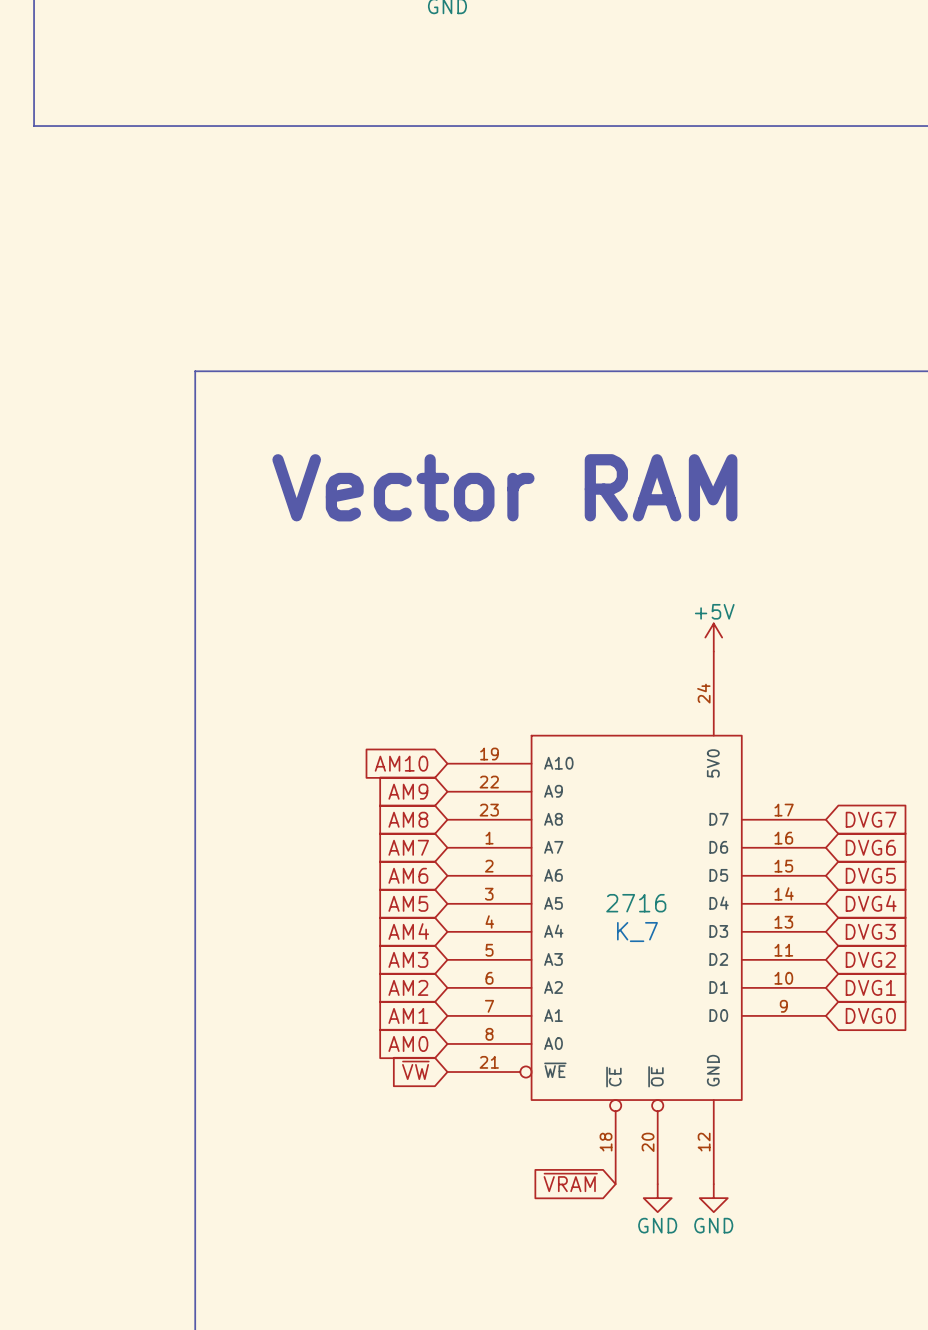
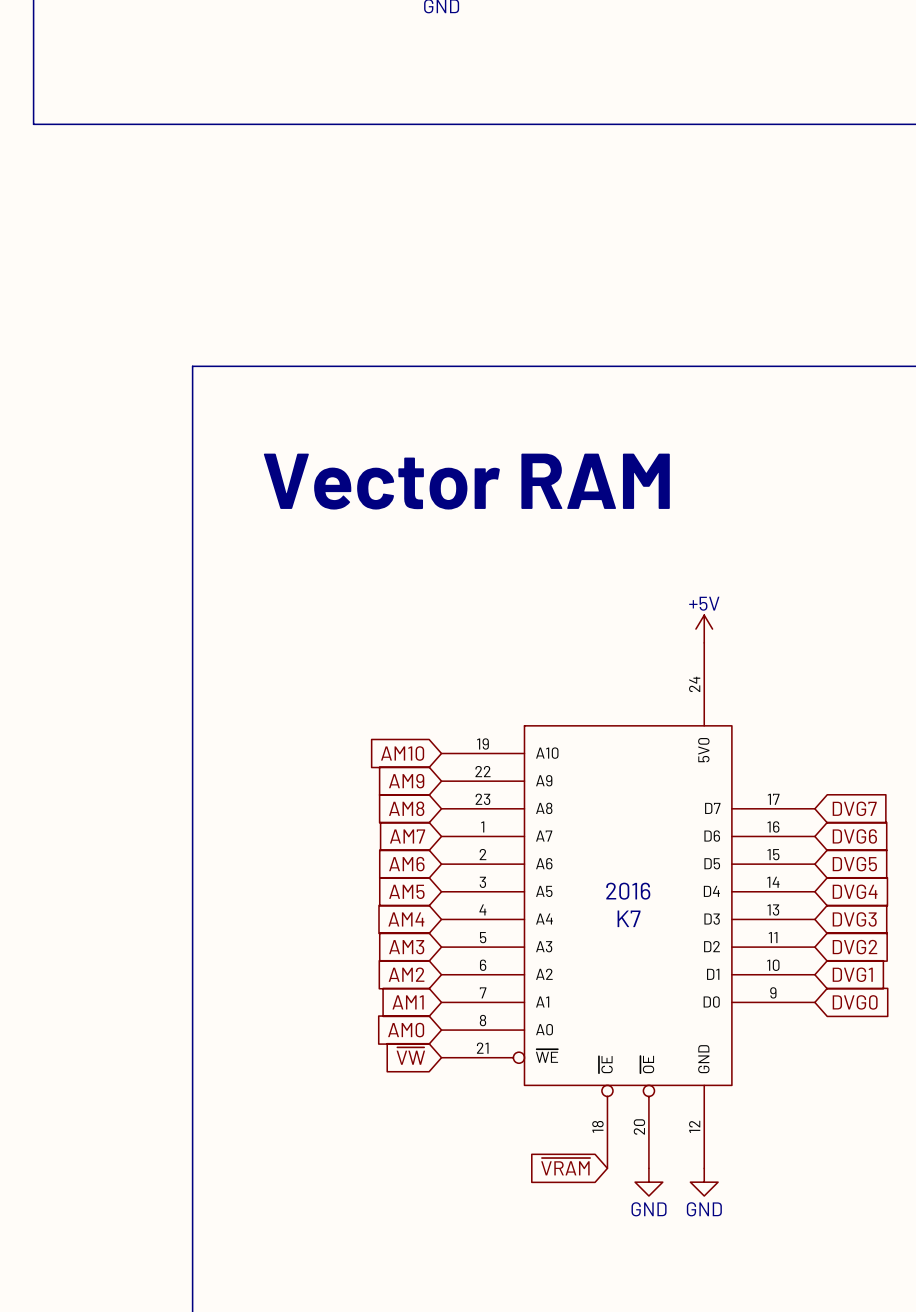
K_7 value: 2716 (636, 903) -> 2016 (628, 891)
K_7 name: K_7 (637, 932) -> K7 (629, 918)

